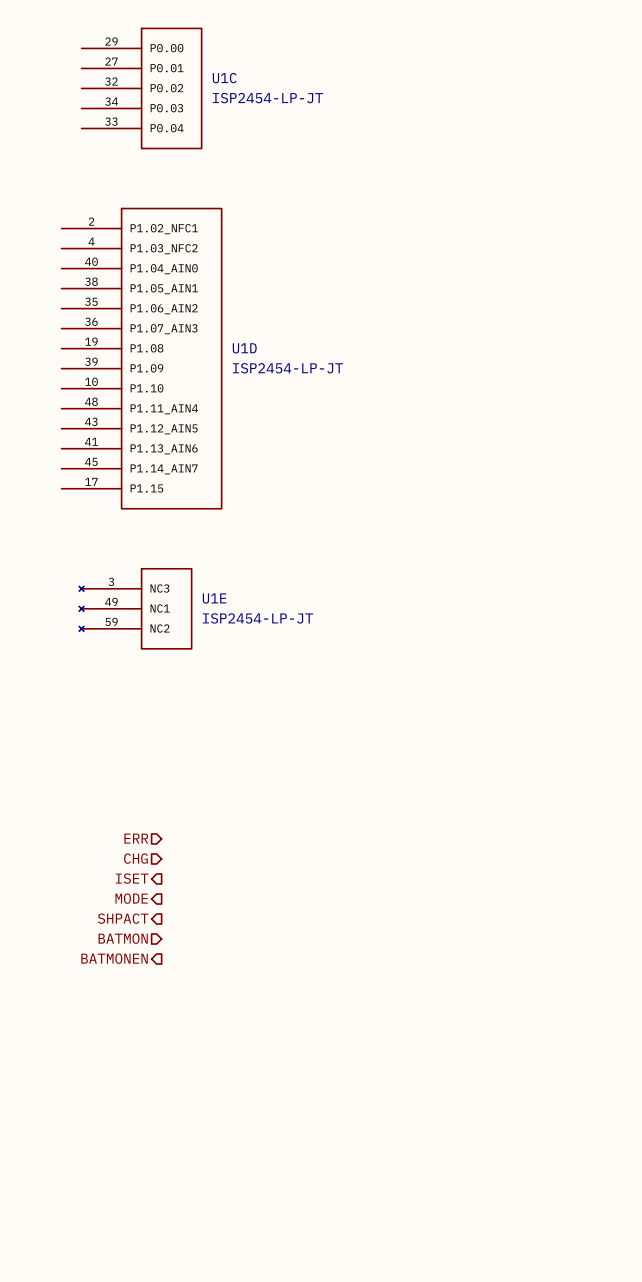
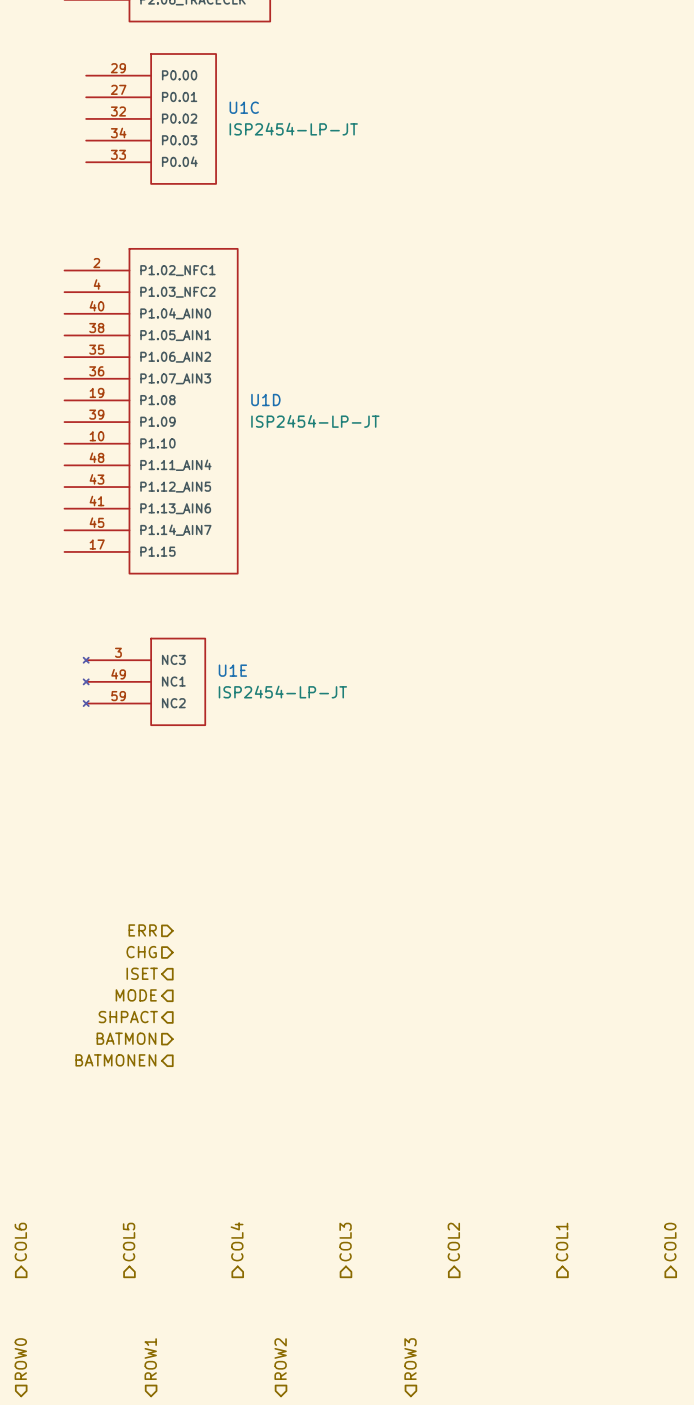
hierarchical label: none -> COL6 (20, 1242)
hierarchical label: none -> COL5 (129, 1242)
hierarchical label: none -> COL4 (237, 1241)
hierarchical label: none -> COL3 (345, 1242)
hierarchical label: none -> COL2 (453, 1242)
hierarchical label: none -> COL1 (562, 1242)
hierarchical label: none -> COL0 (670, 1242)
hierarchical label: none -> ROW0 (20, 1359)
hierarchical label: none -> ROW1 (150, 1359)
hierarchical label: none -> ROW2 (280, 1359)
hierarchical label: none -> ROW3 (410, 1359)

